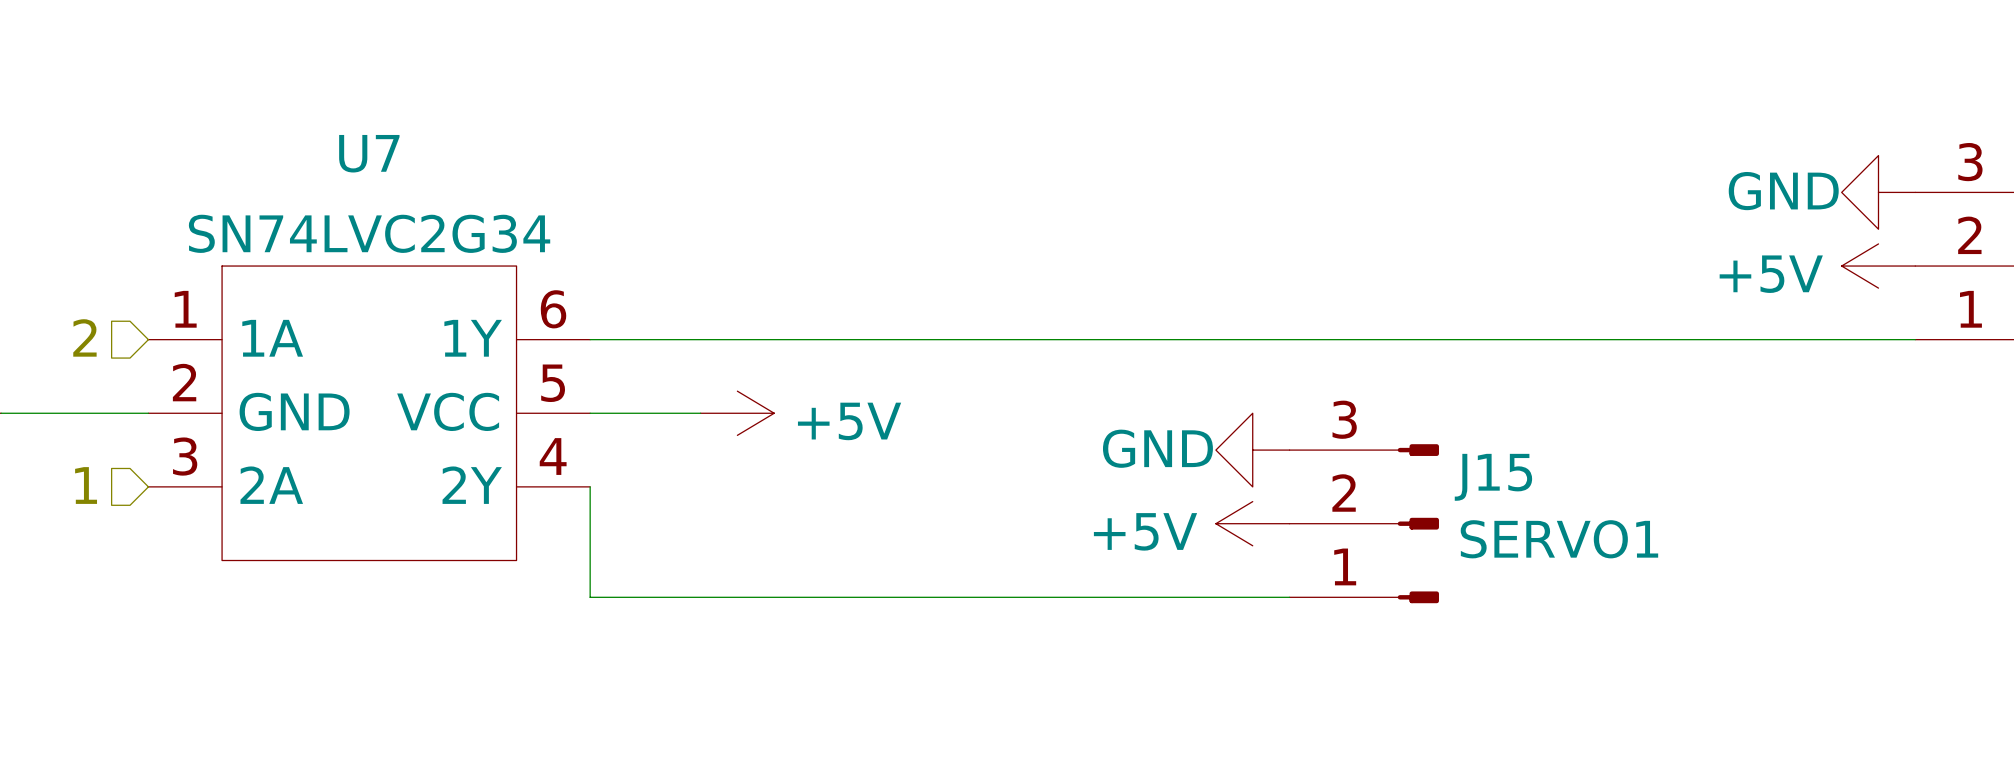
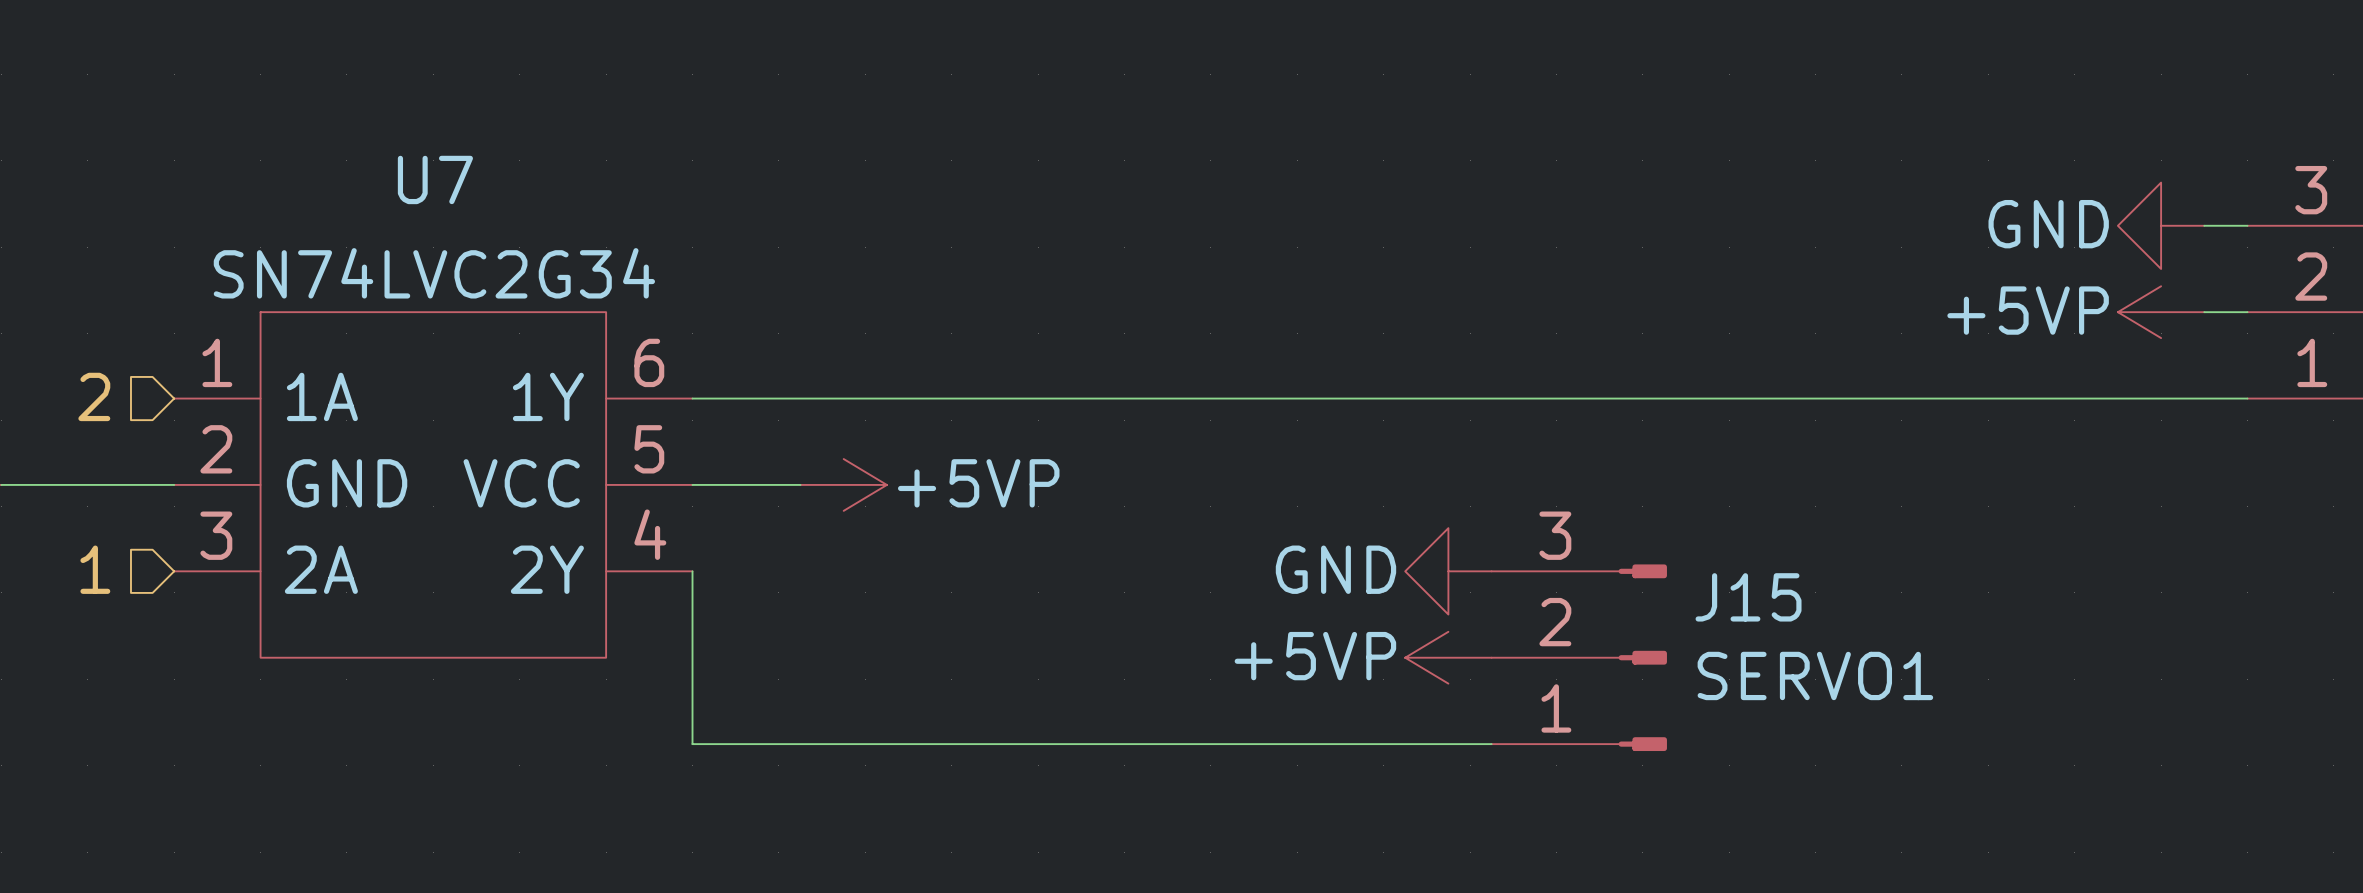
power symbol position: GND (1878, 192) -> GND (2161, 225)
power symbol: none -> +5VP (2161, 312)
power symbol: +5V (1878, 266) -> none
power symbol: +5V (737, 413) -> +5VP (843, 484)
power symbol position: GND (1252, 450) -> GND (1448, 571)
power symbol: +5V (1252, 523) -> none
J15 position: (1364, 523) -> (1579, 657)
power symbol: none -> +5VP (1448, 657)
wire: (590, 597) (1289, 597) -> (692, 700) (692, 744) (1491, 744)

